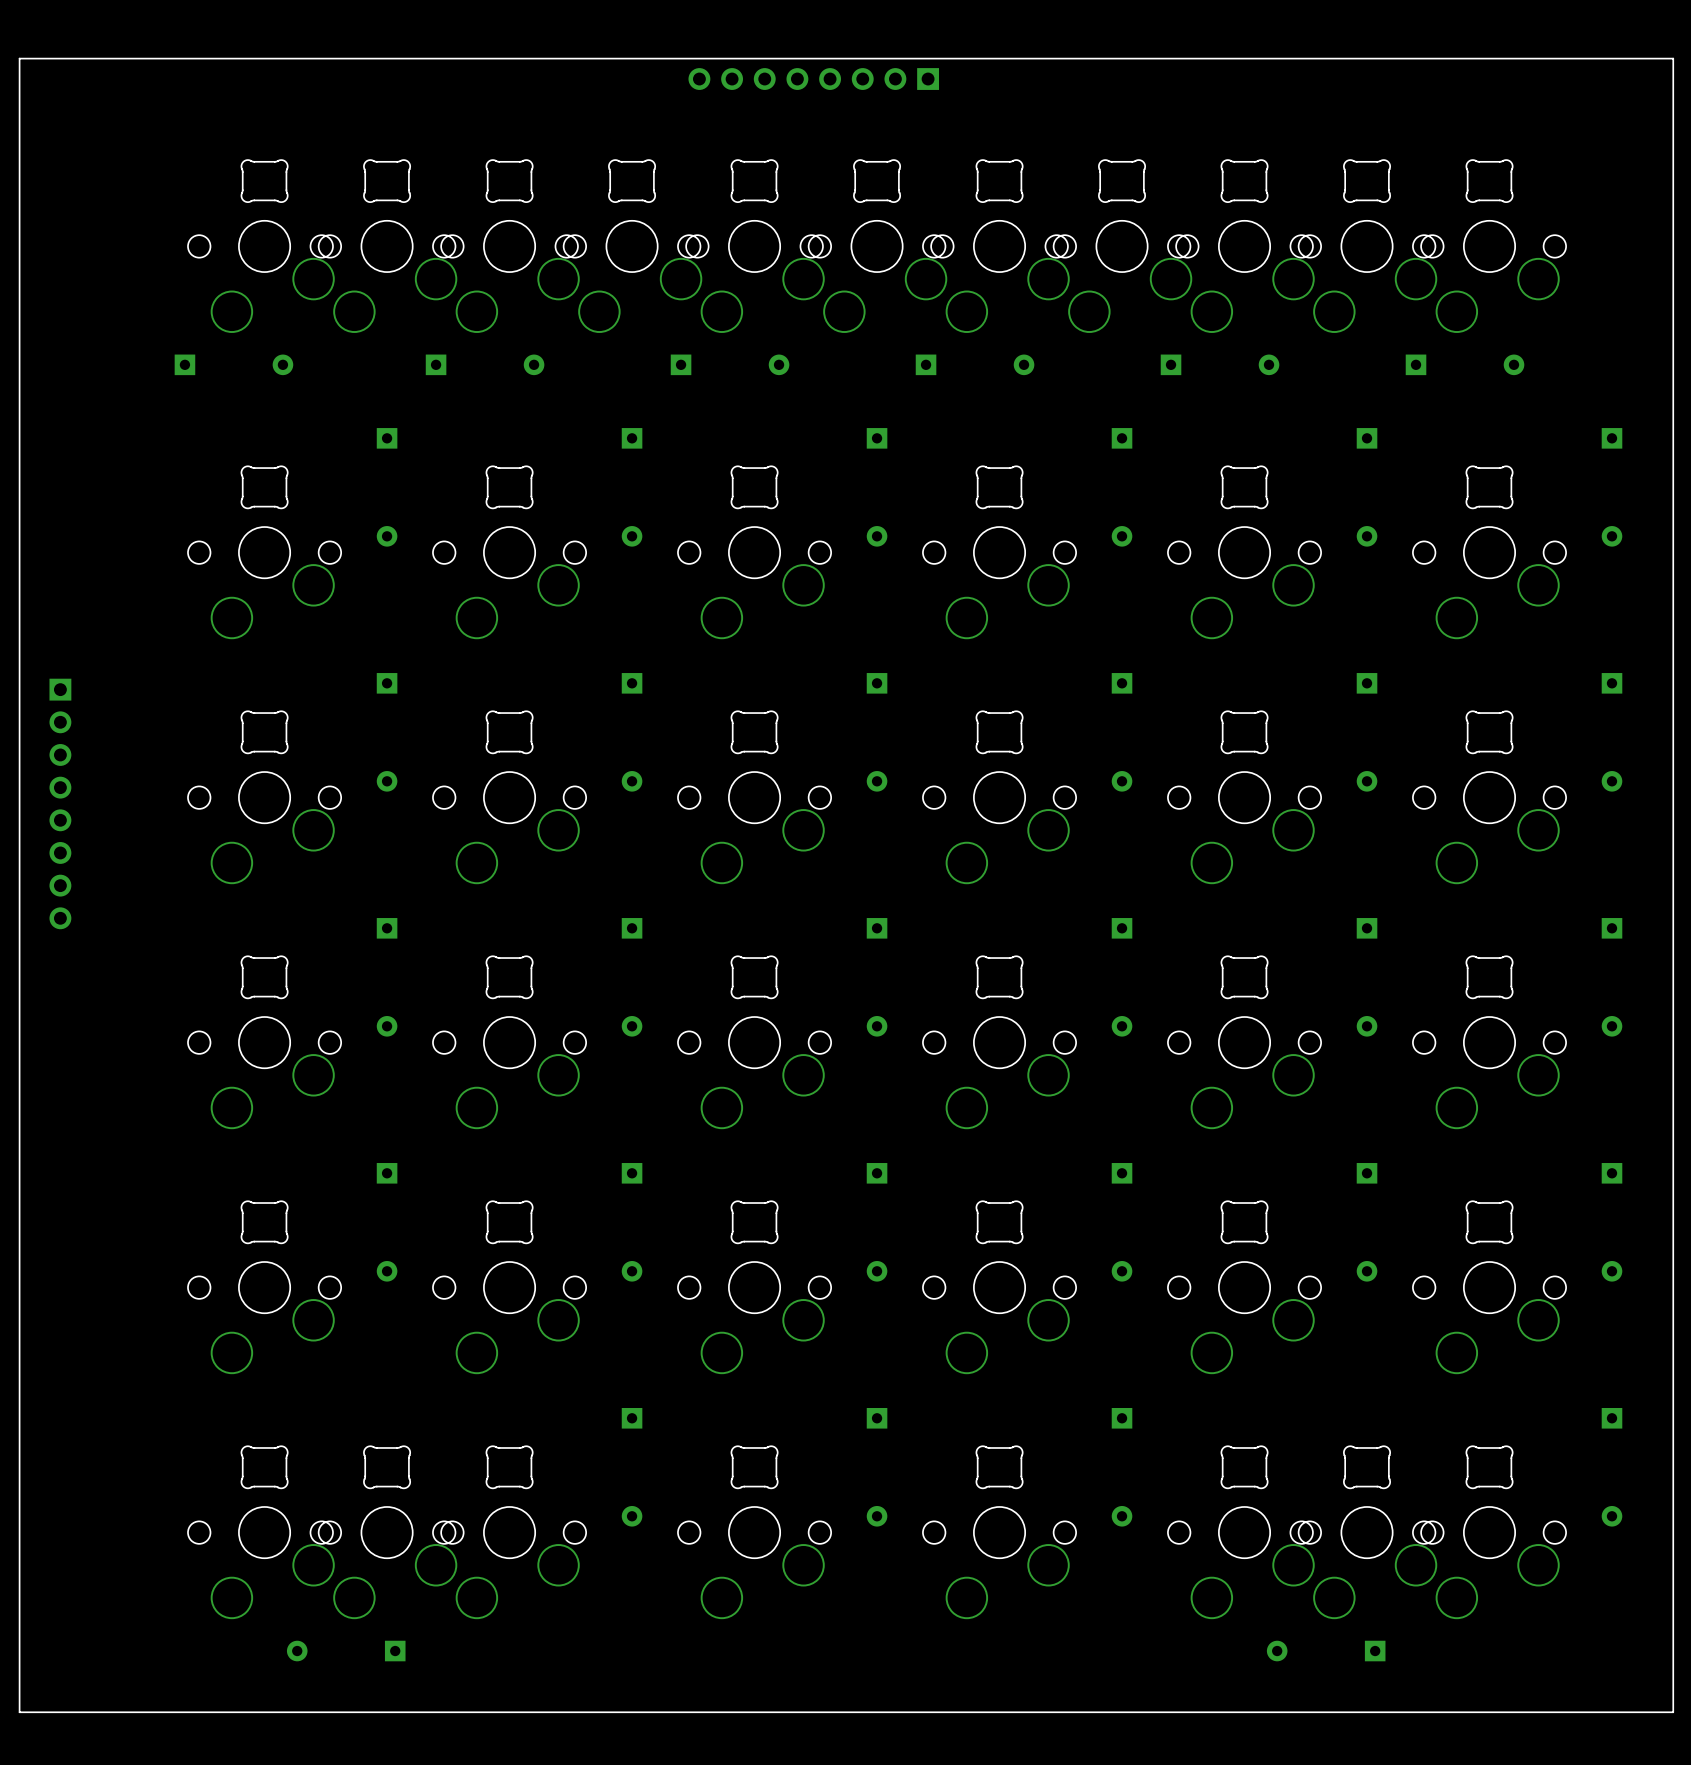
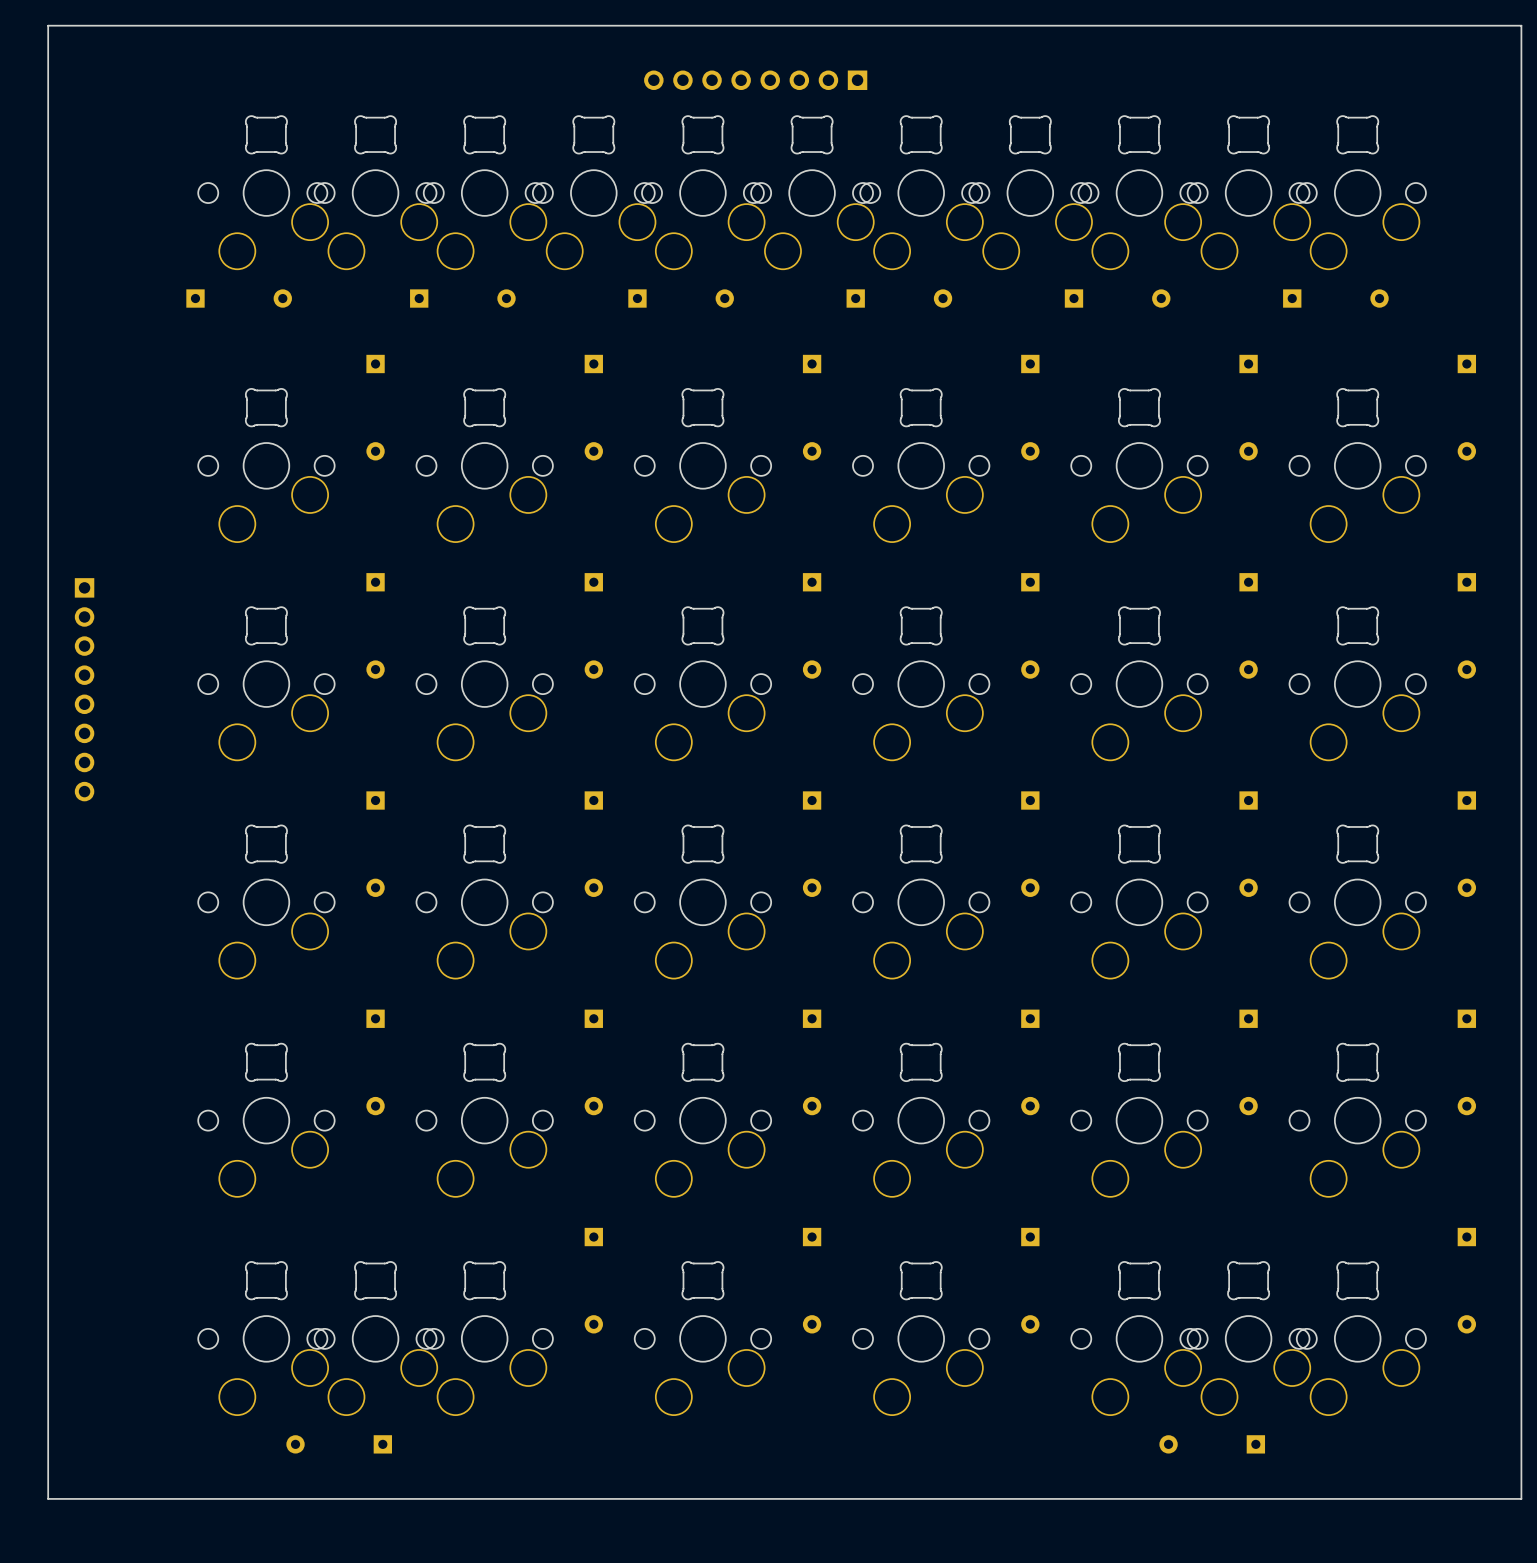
part position: (813, 79) -> (755, 80)

